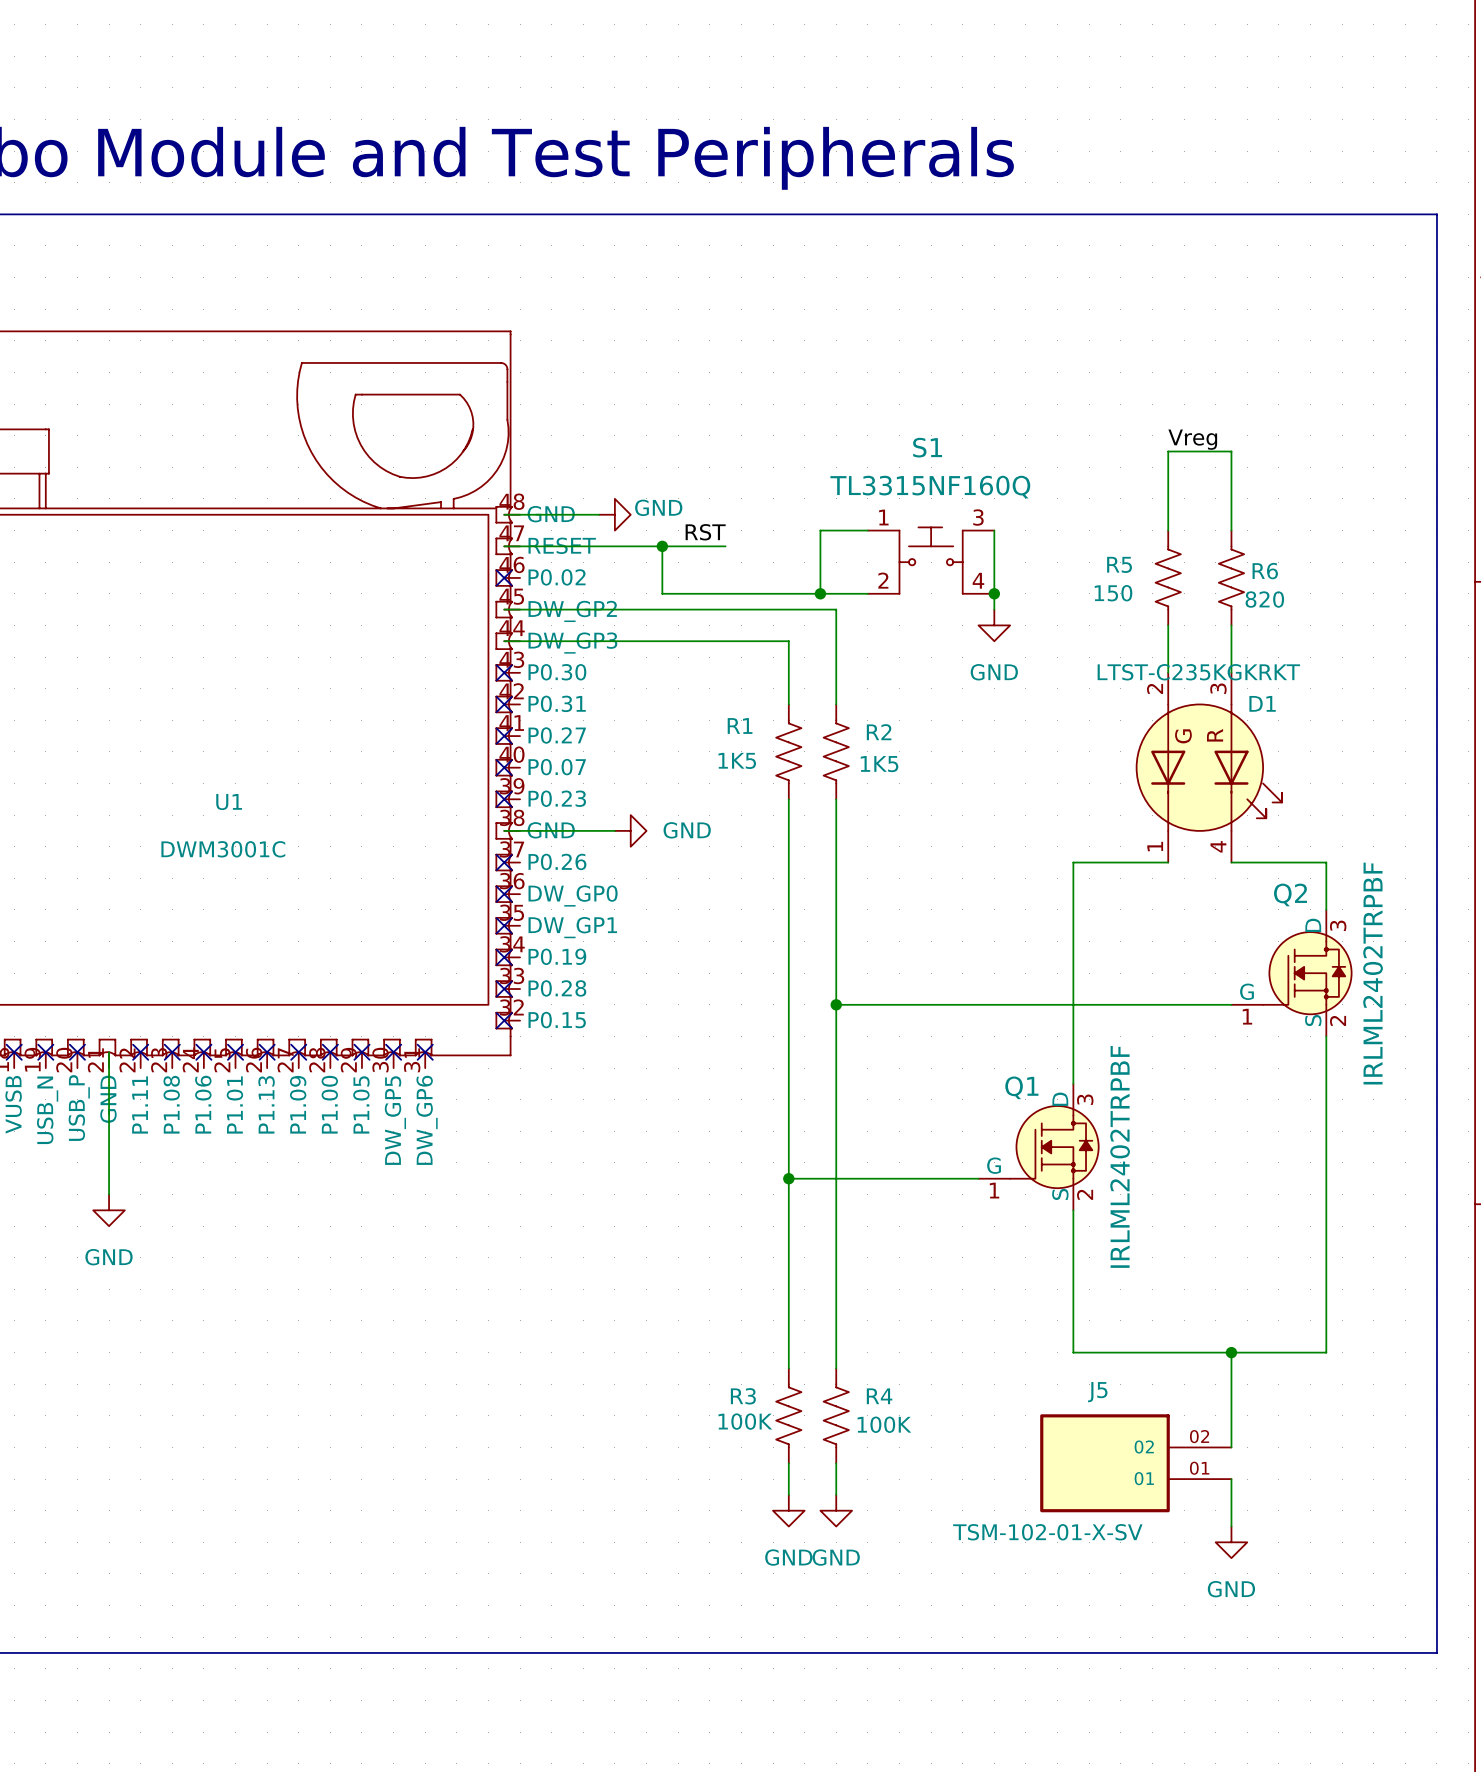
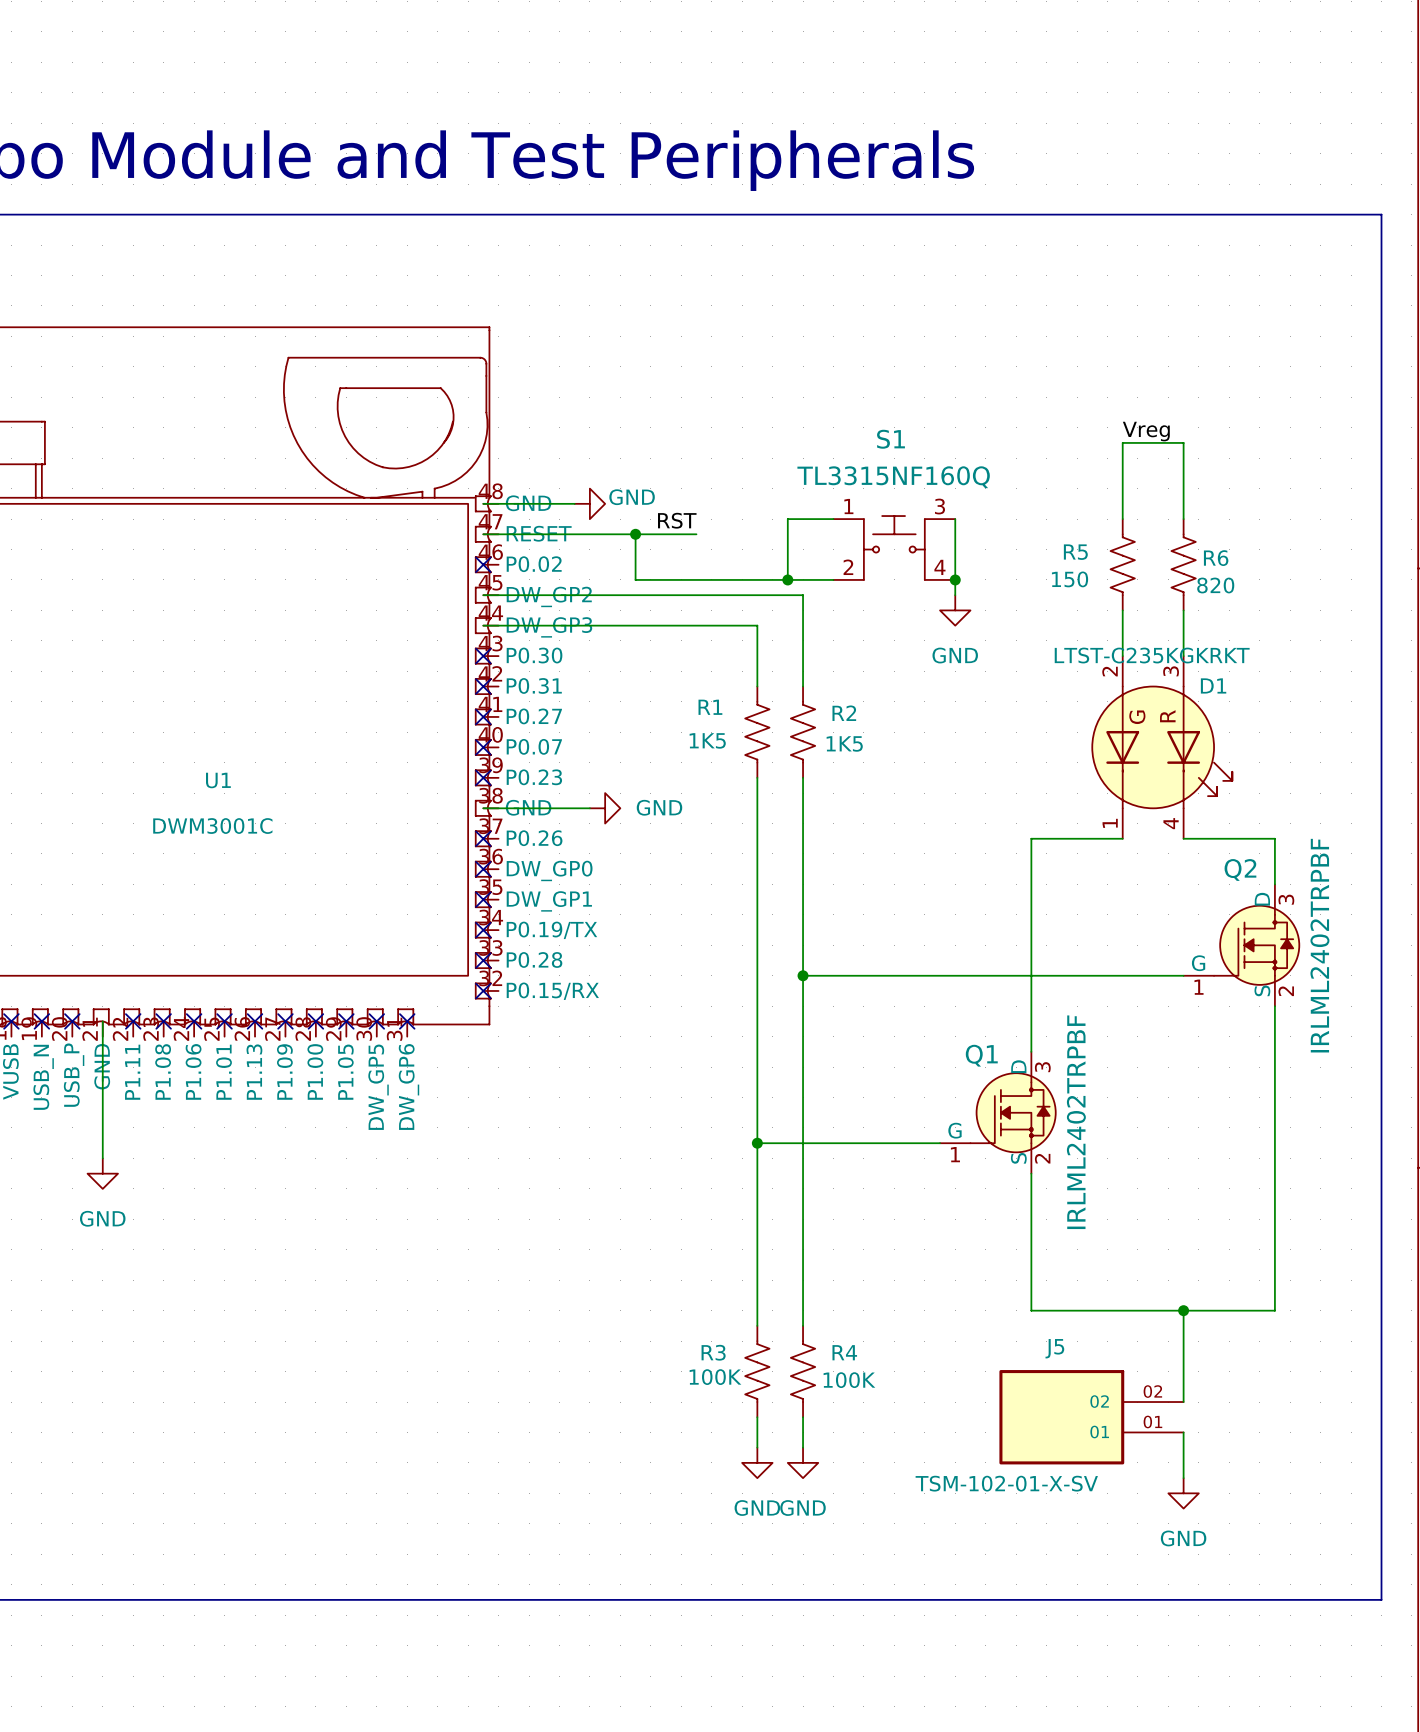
U1 pin name: P0.19 (557, 956) -> P0.19/TX (551, 930)
U1 pin name: P0.15 (557, 1020) -> P0.15/RX (552, 991)

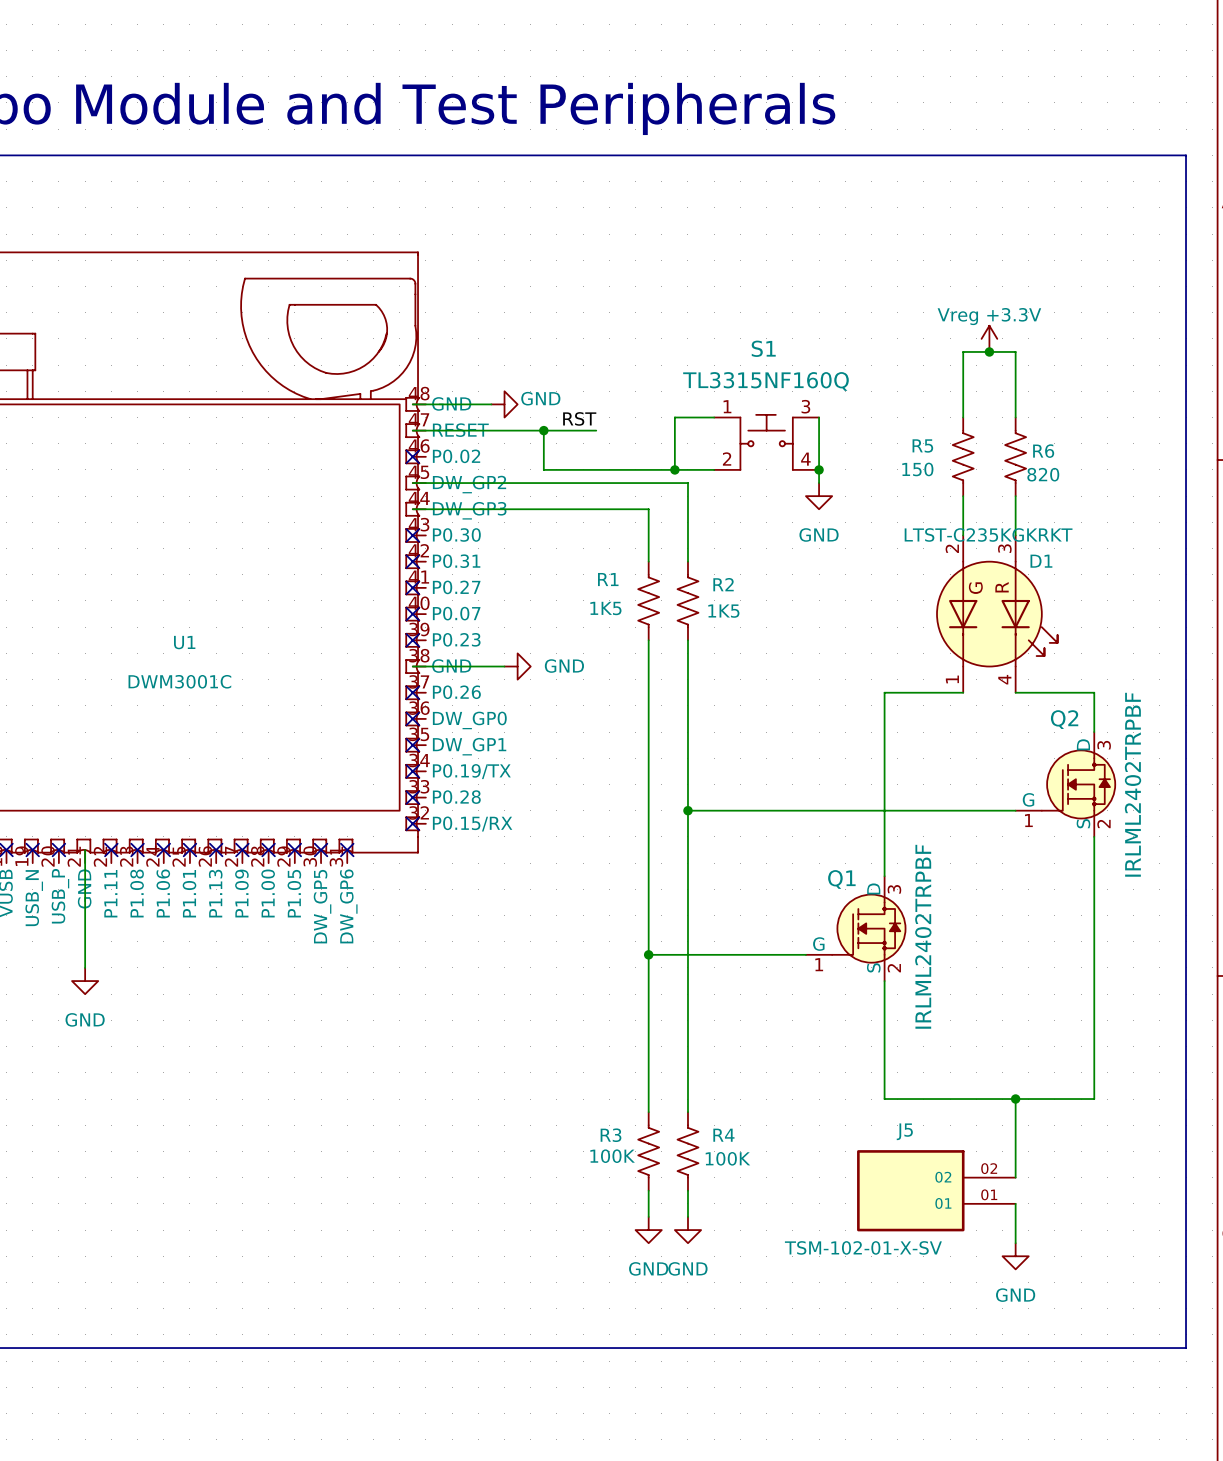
power symbol: none -> Vreg +3.3V (989, 338)
label: Vreg (1146, 431) -> none
junction: none -> (989, 351)

